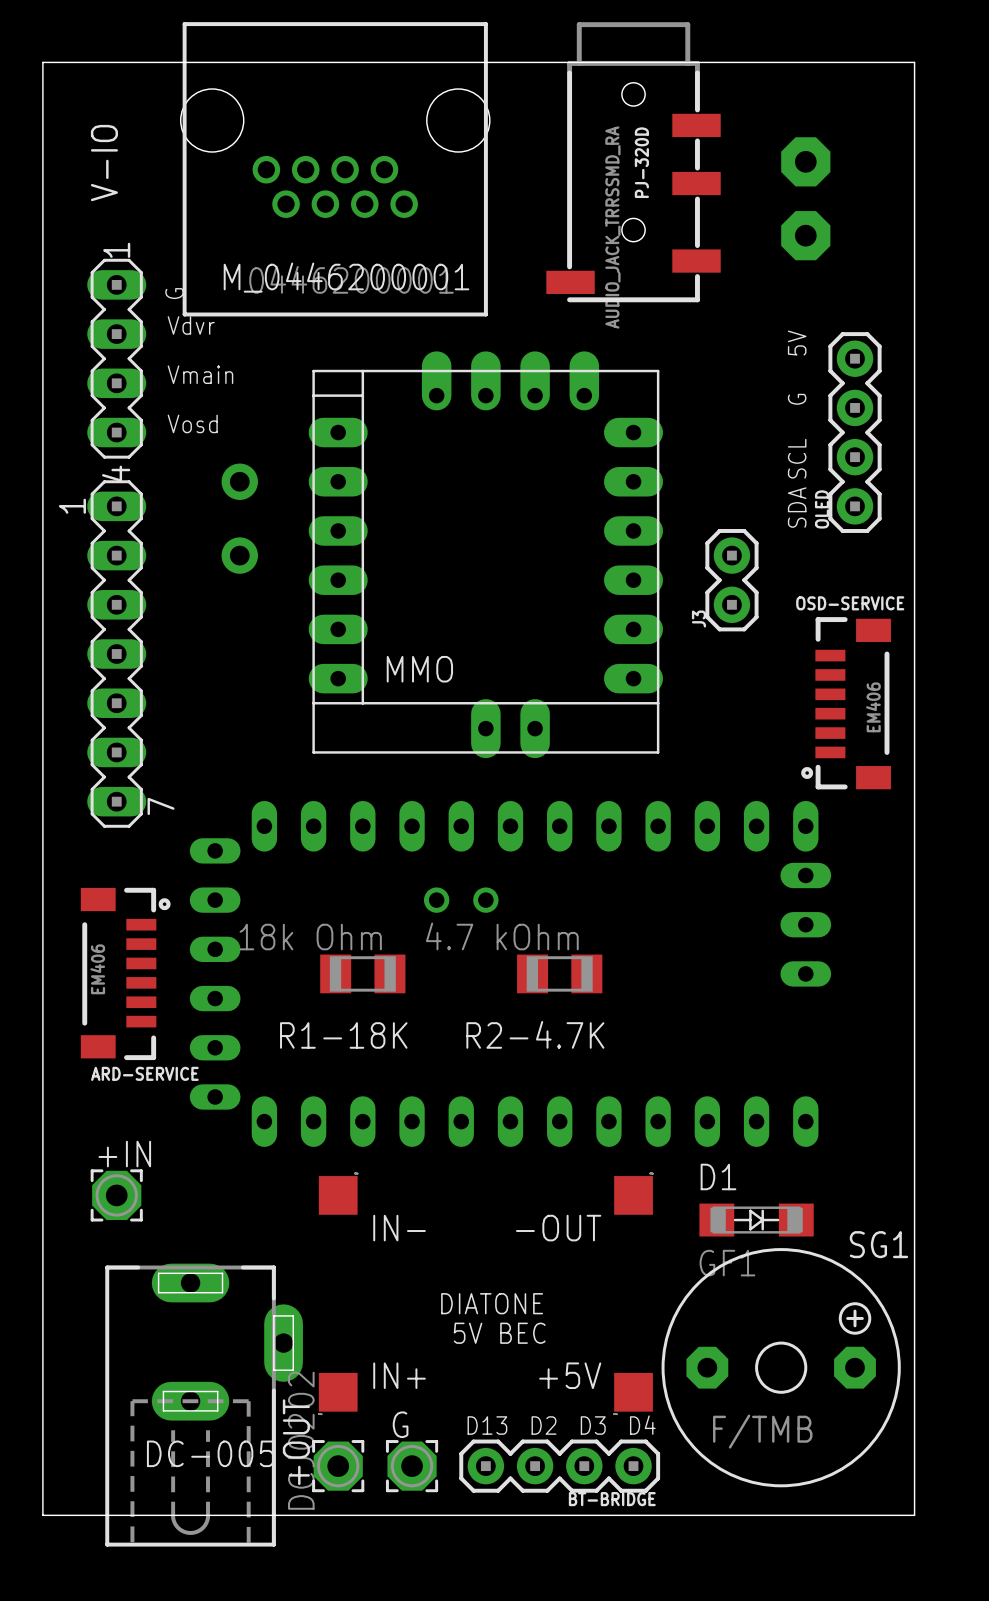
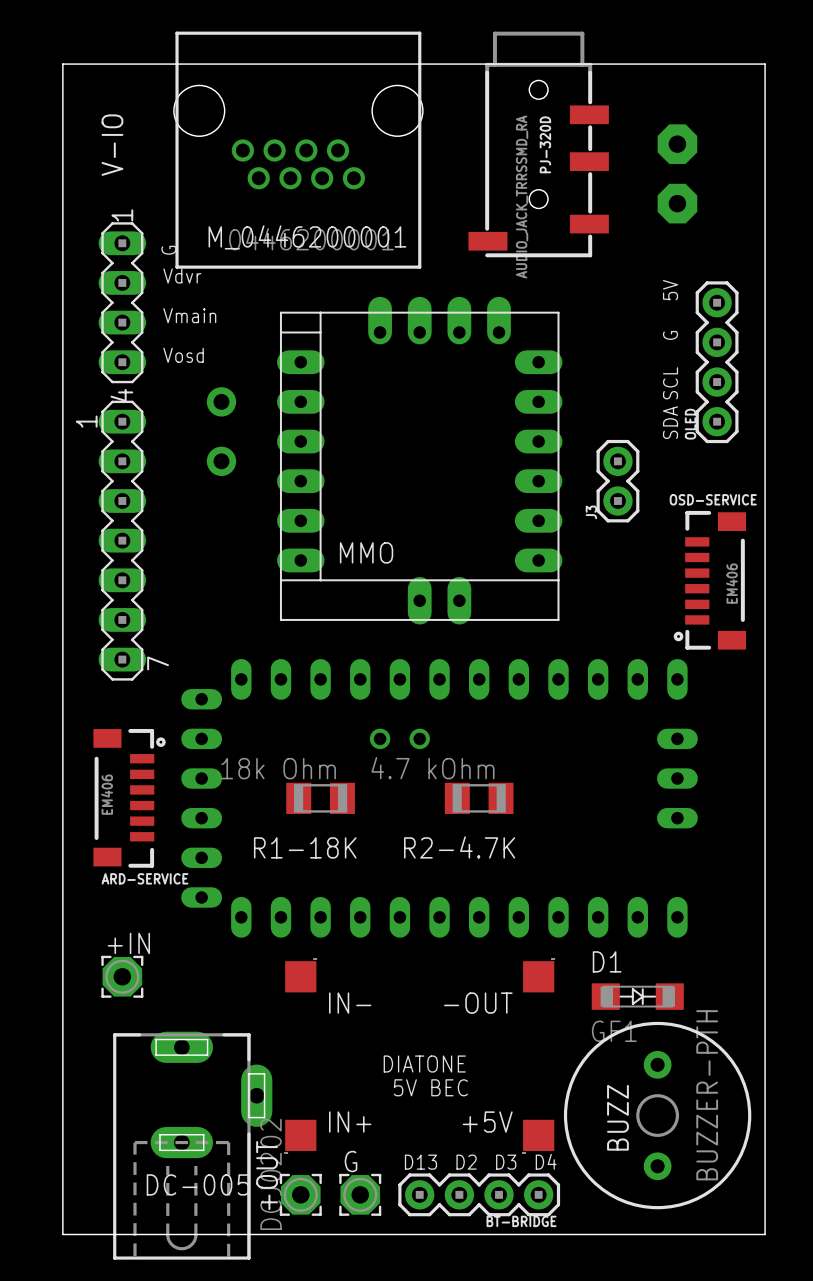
part footprint: [189, 800, 832, 1147] -> [181, 658, 698, 938]
SG1: F/TMB (781, 1367) -> none
BUZZ: none -> BUZZER-PTH (657, 1115)

